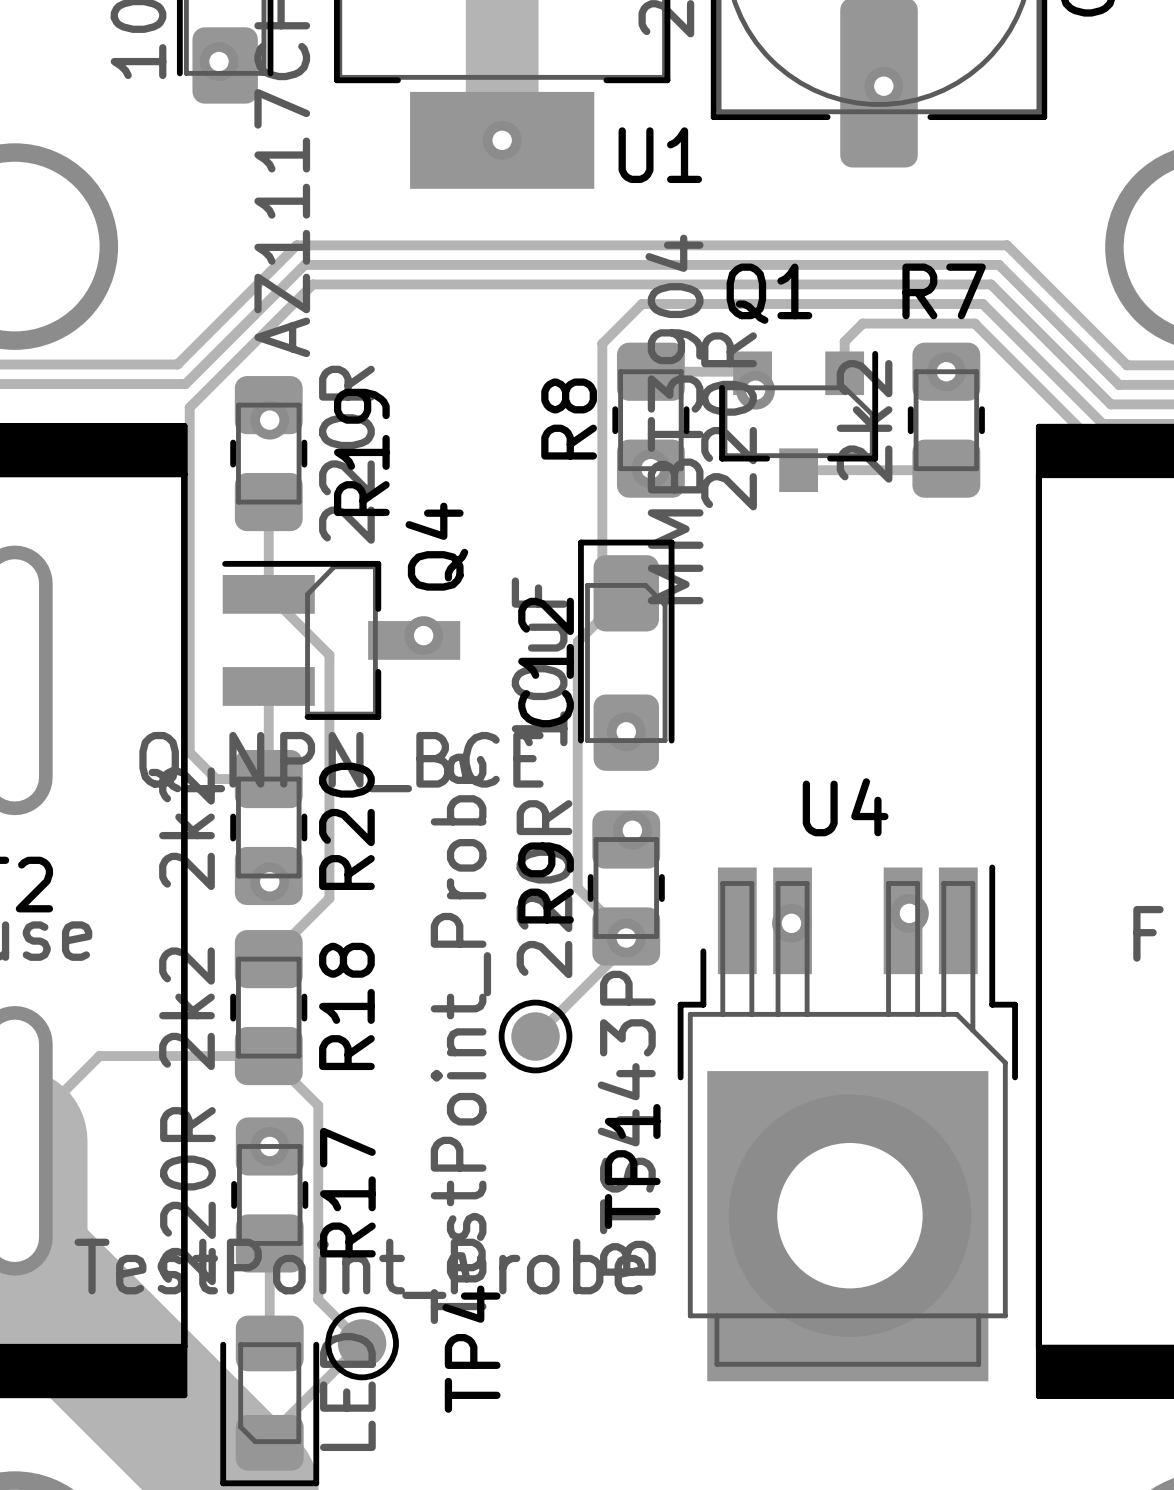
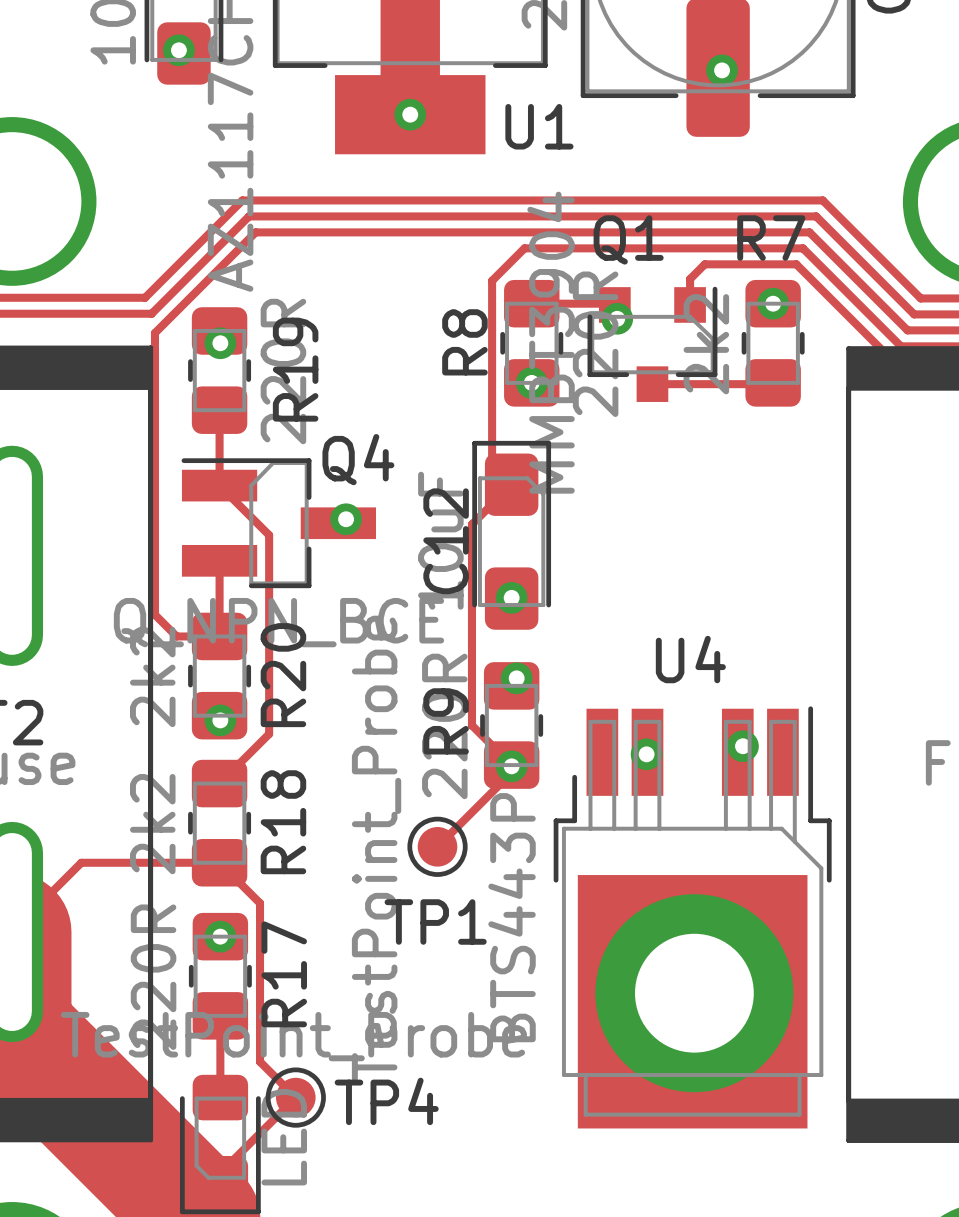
Q4 name rotation: 0° (436, 546) -> 90° clockwise (358, 459)
TP1 name rotation: 0° (632, 1166) -> 90° clockwise (435, 921)
TP4 name rotation: 0° (471, 1349) -> 90° clockwise (386, 1101)

